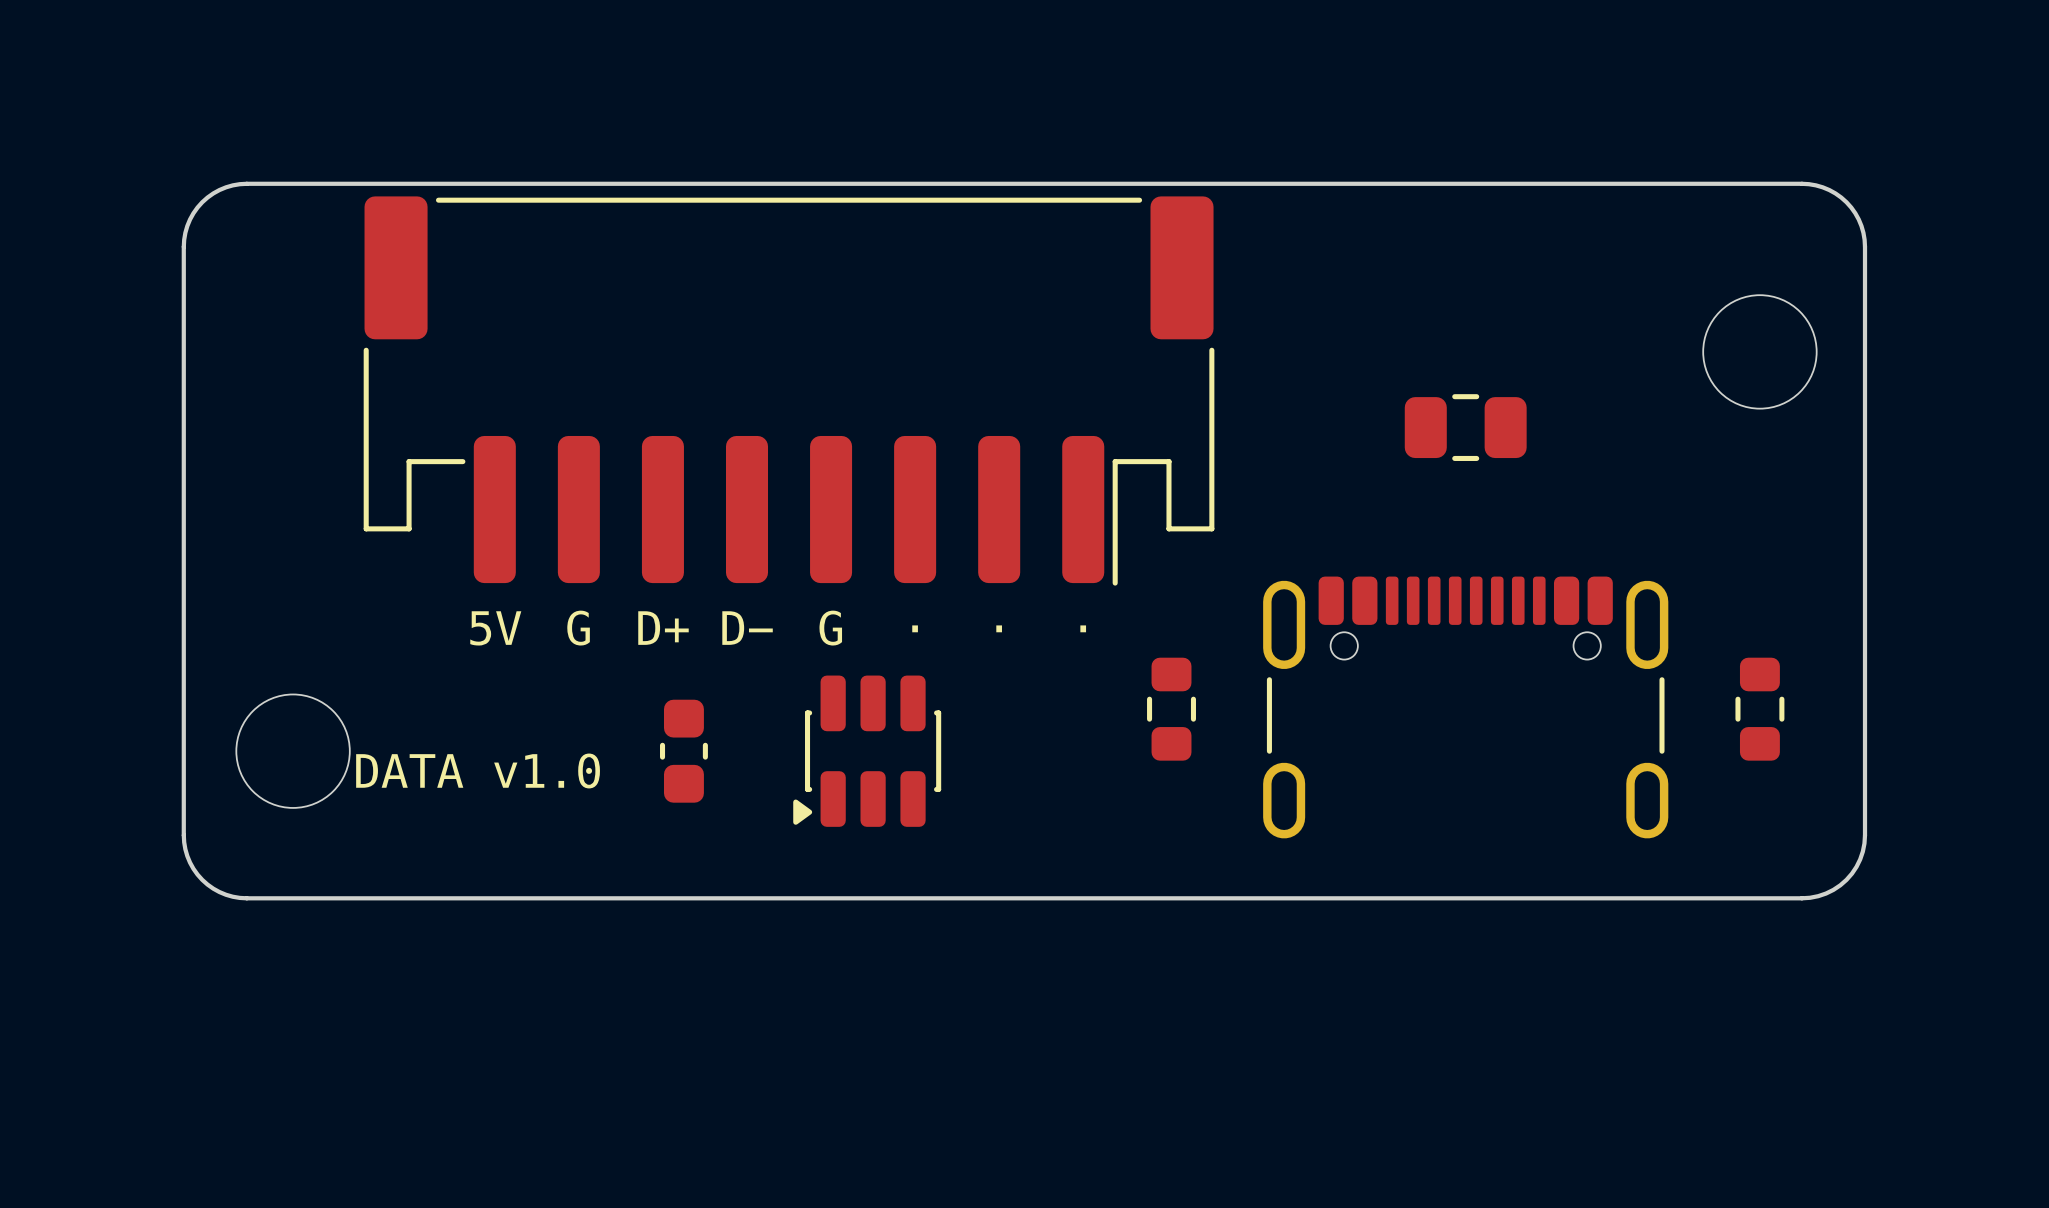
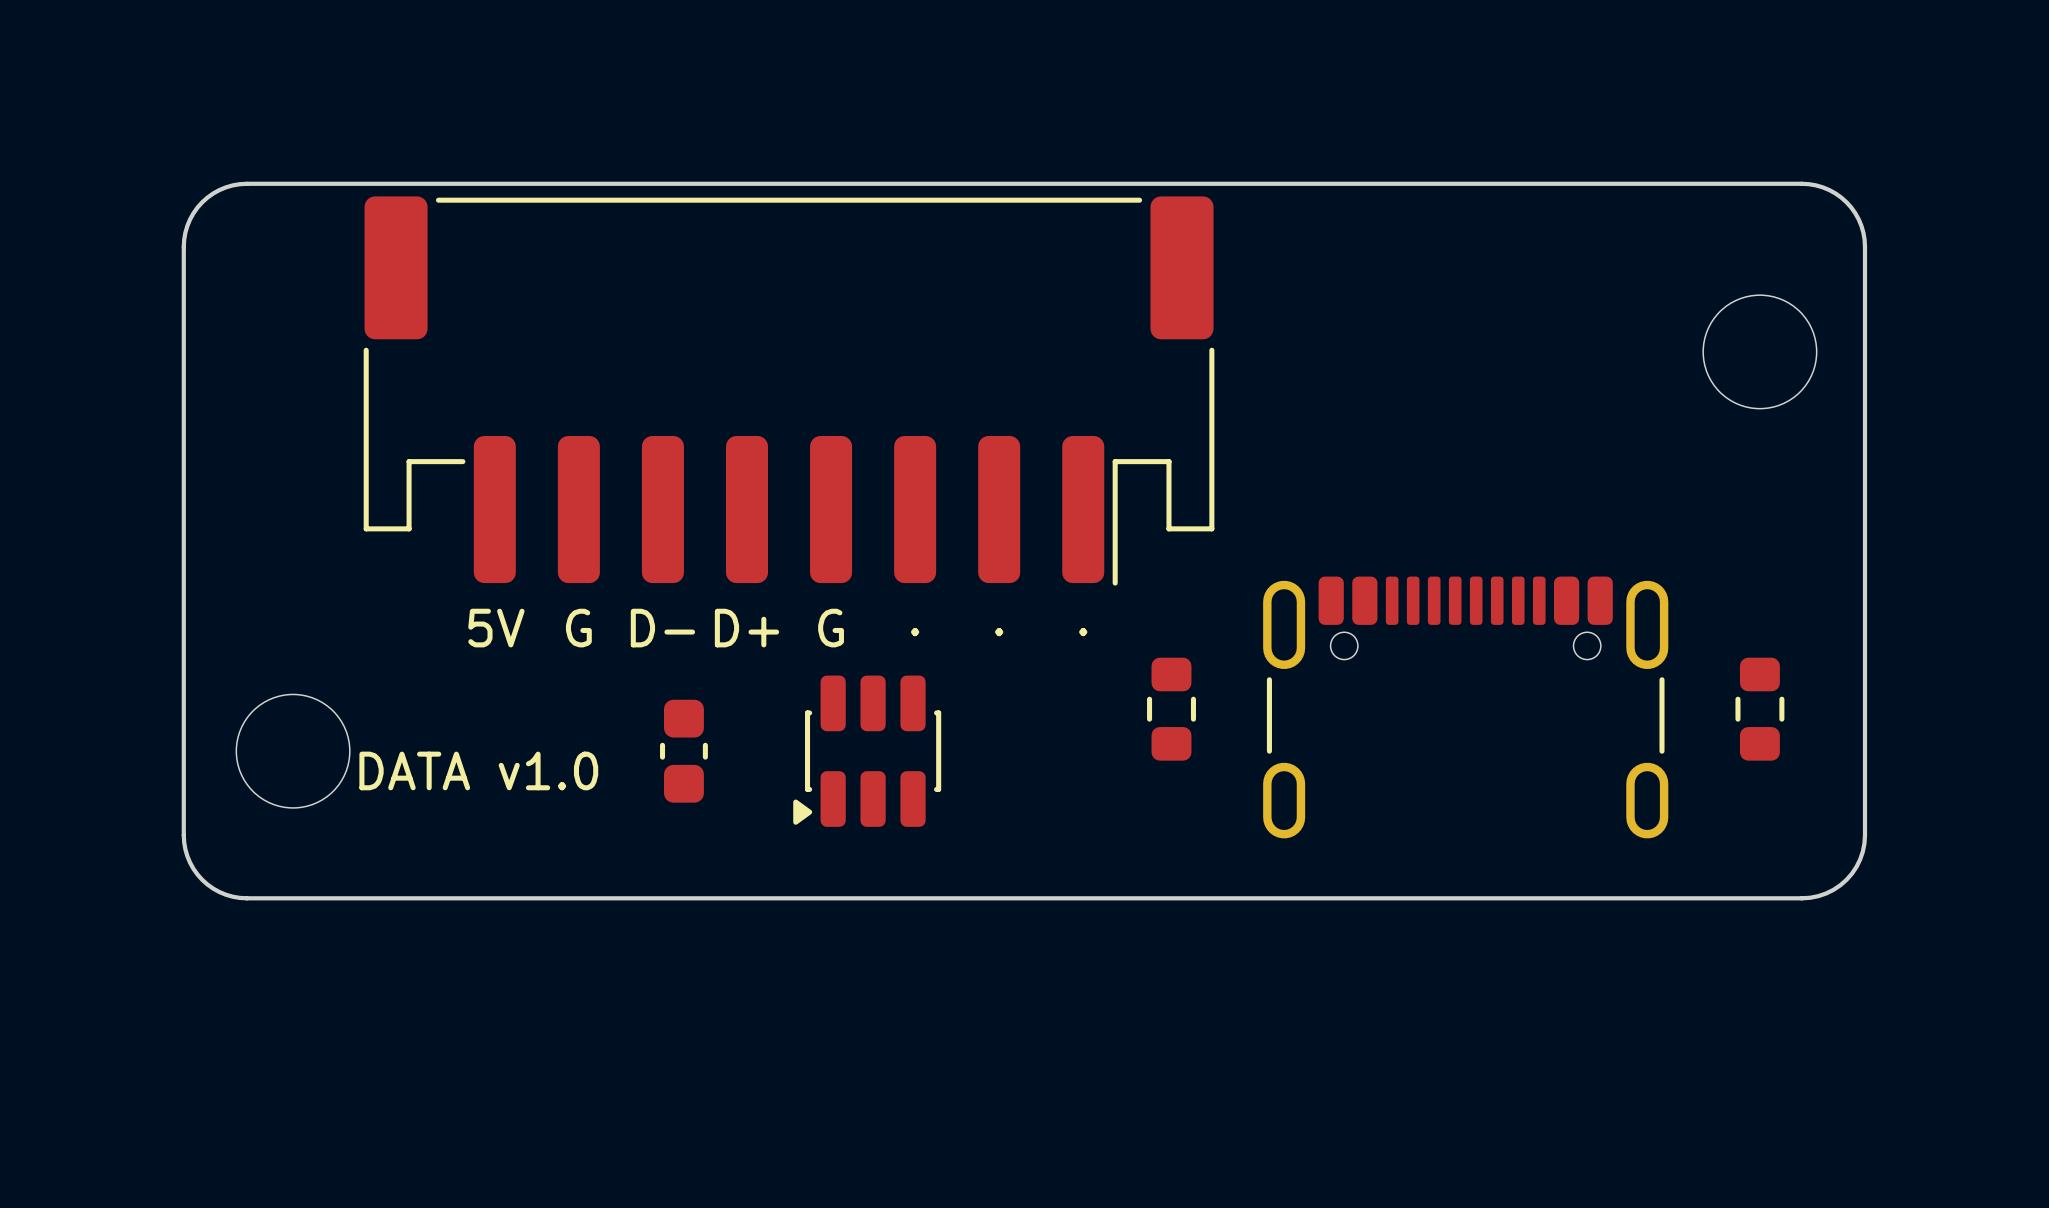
part: (1465, 427) -> none
text: D+ (663, 628) -> D− (662, 628)
text: D− (747, 628) -> D+ (747, 628)

